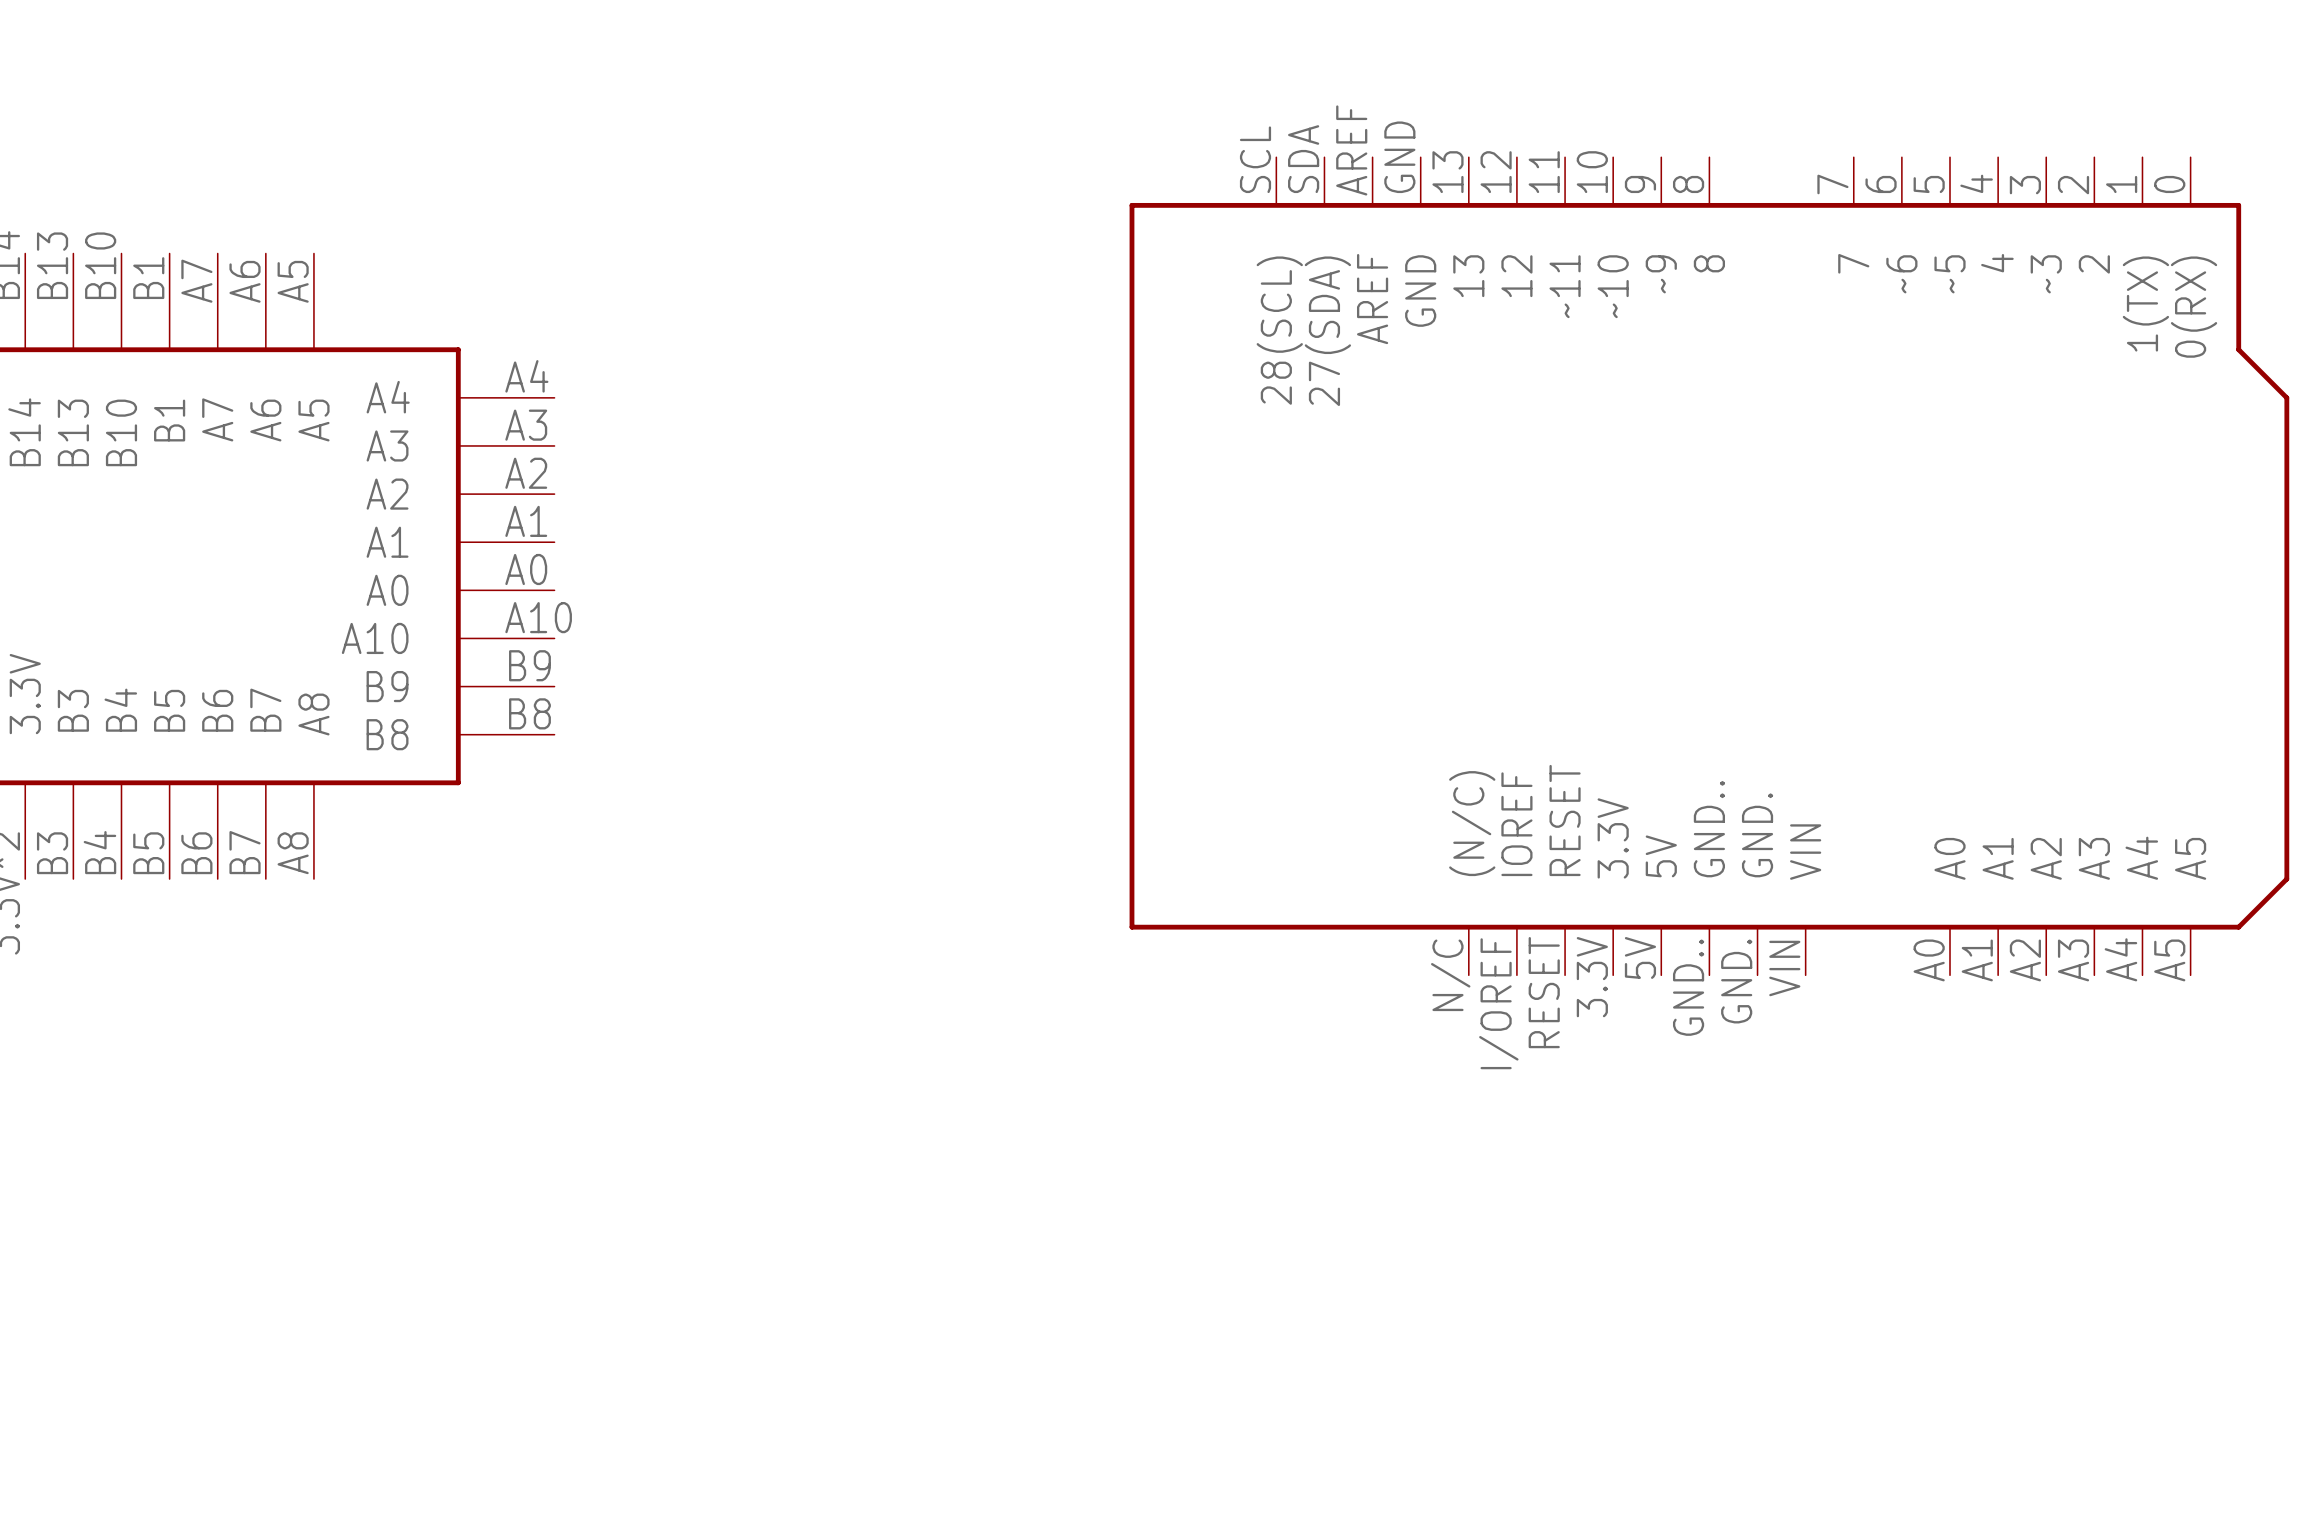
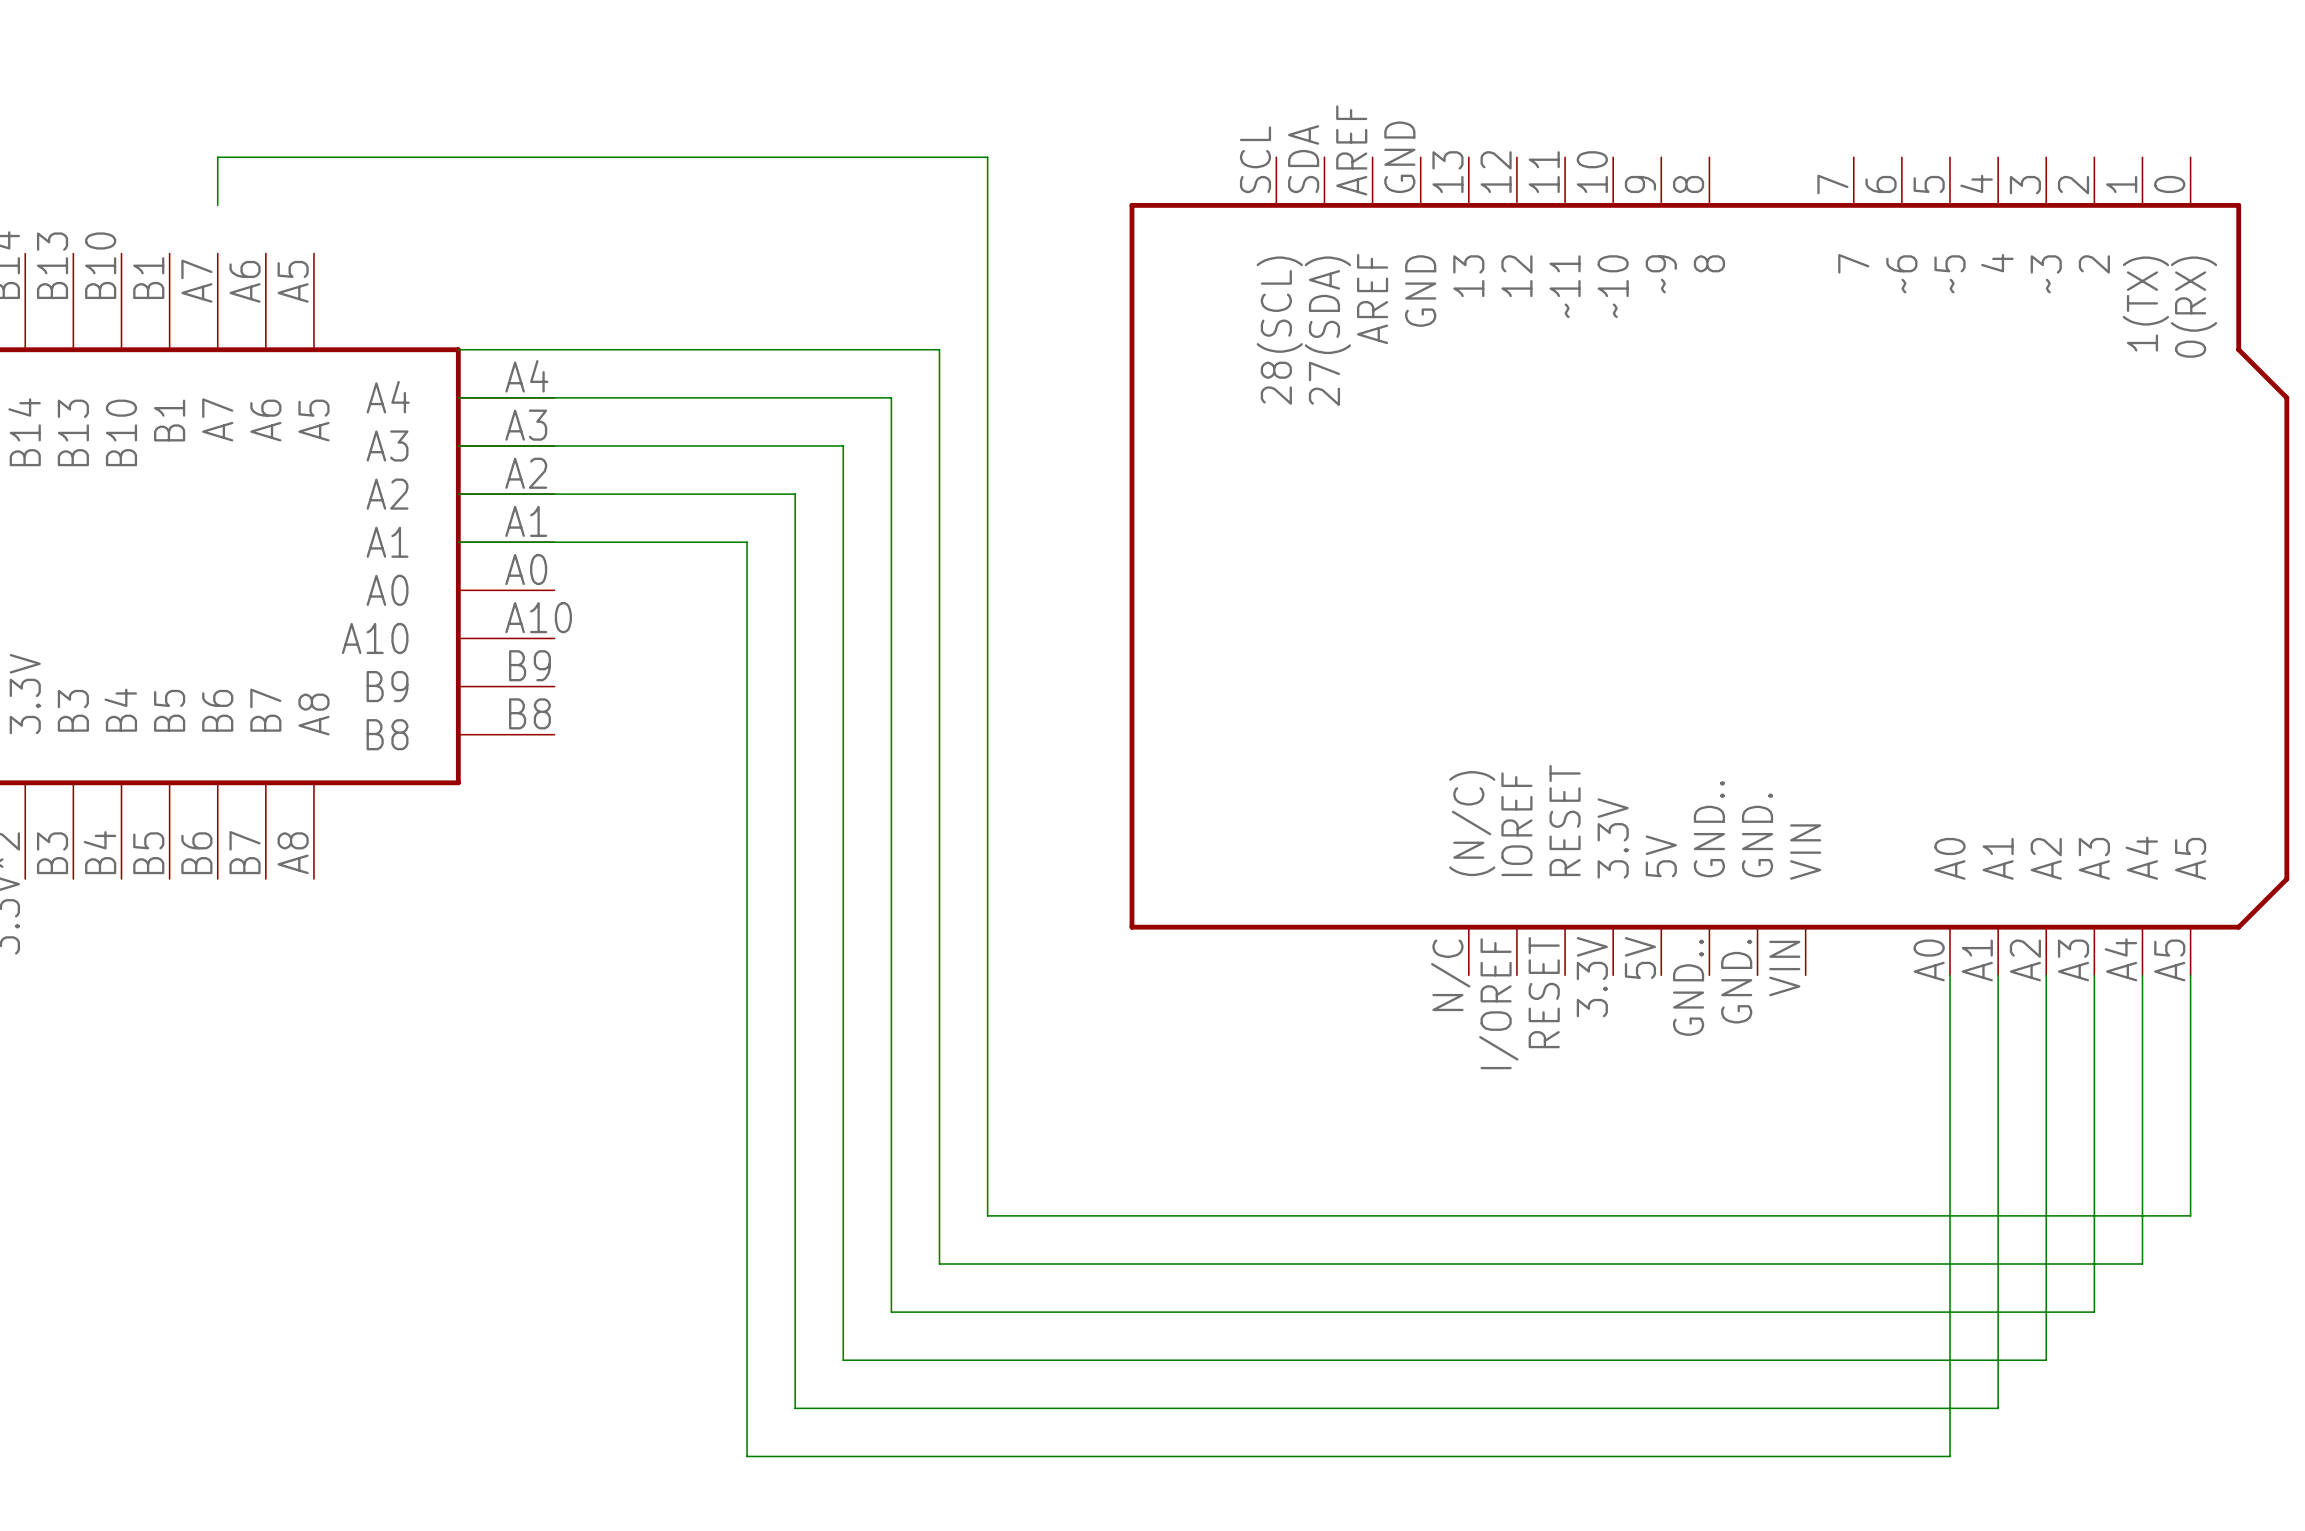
wire: none -> (217, 205) (217, 157) (987, 157) (987, 1215) (2190, 1215) (2190, 975)
wire: none -> (458, 349) (939, 349) (939, 1264) (2142, 1264) (2142, 975)
wire: none -> (458, 397) (891, 397) (891, 1312) (2094, 1312) (2094, 975)
wire: none -> (458, 445) (843, 445) (843, 1360) (2046, 1360) (2046, 975)
wire: none -> (458, 494) (795, 494) (795, 1408) (1998, 1408) (1998, 975)
wire: none -> (458, 542) (747, 542) (747, 1456) (1950, 1456) (1950, 975)

